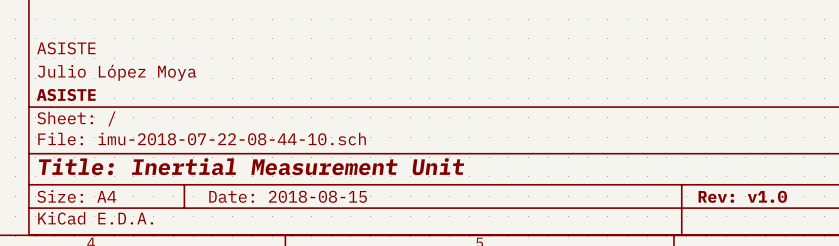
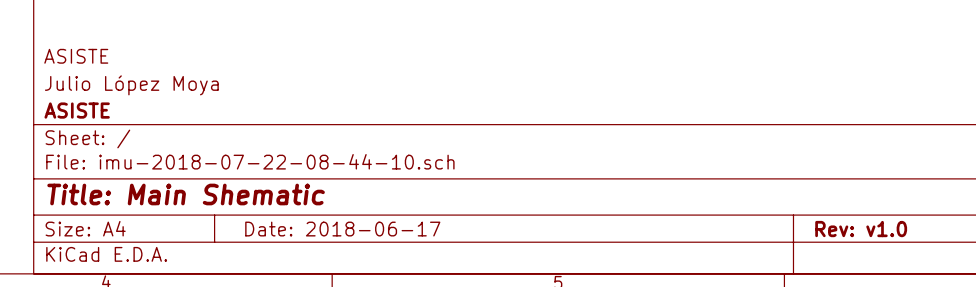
title block: Title: Inertial Measurement Unit (251, 166) -> Title: Main Shematic (186, 194)
title block: Date: 2018-08-15 (288, 196) -> Date: 2018-06-17 (342, 229)

